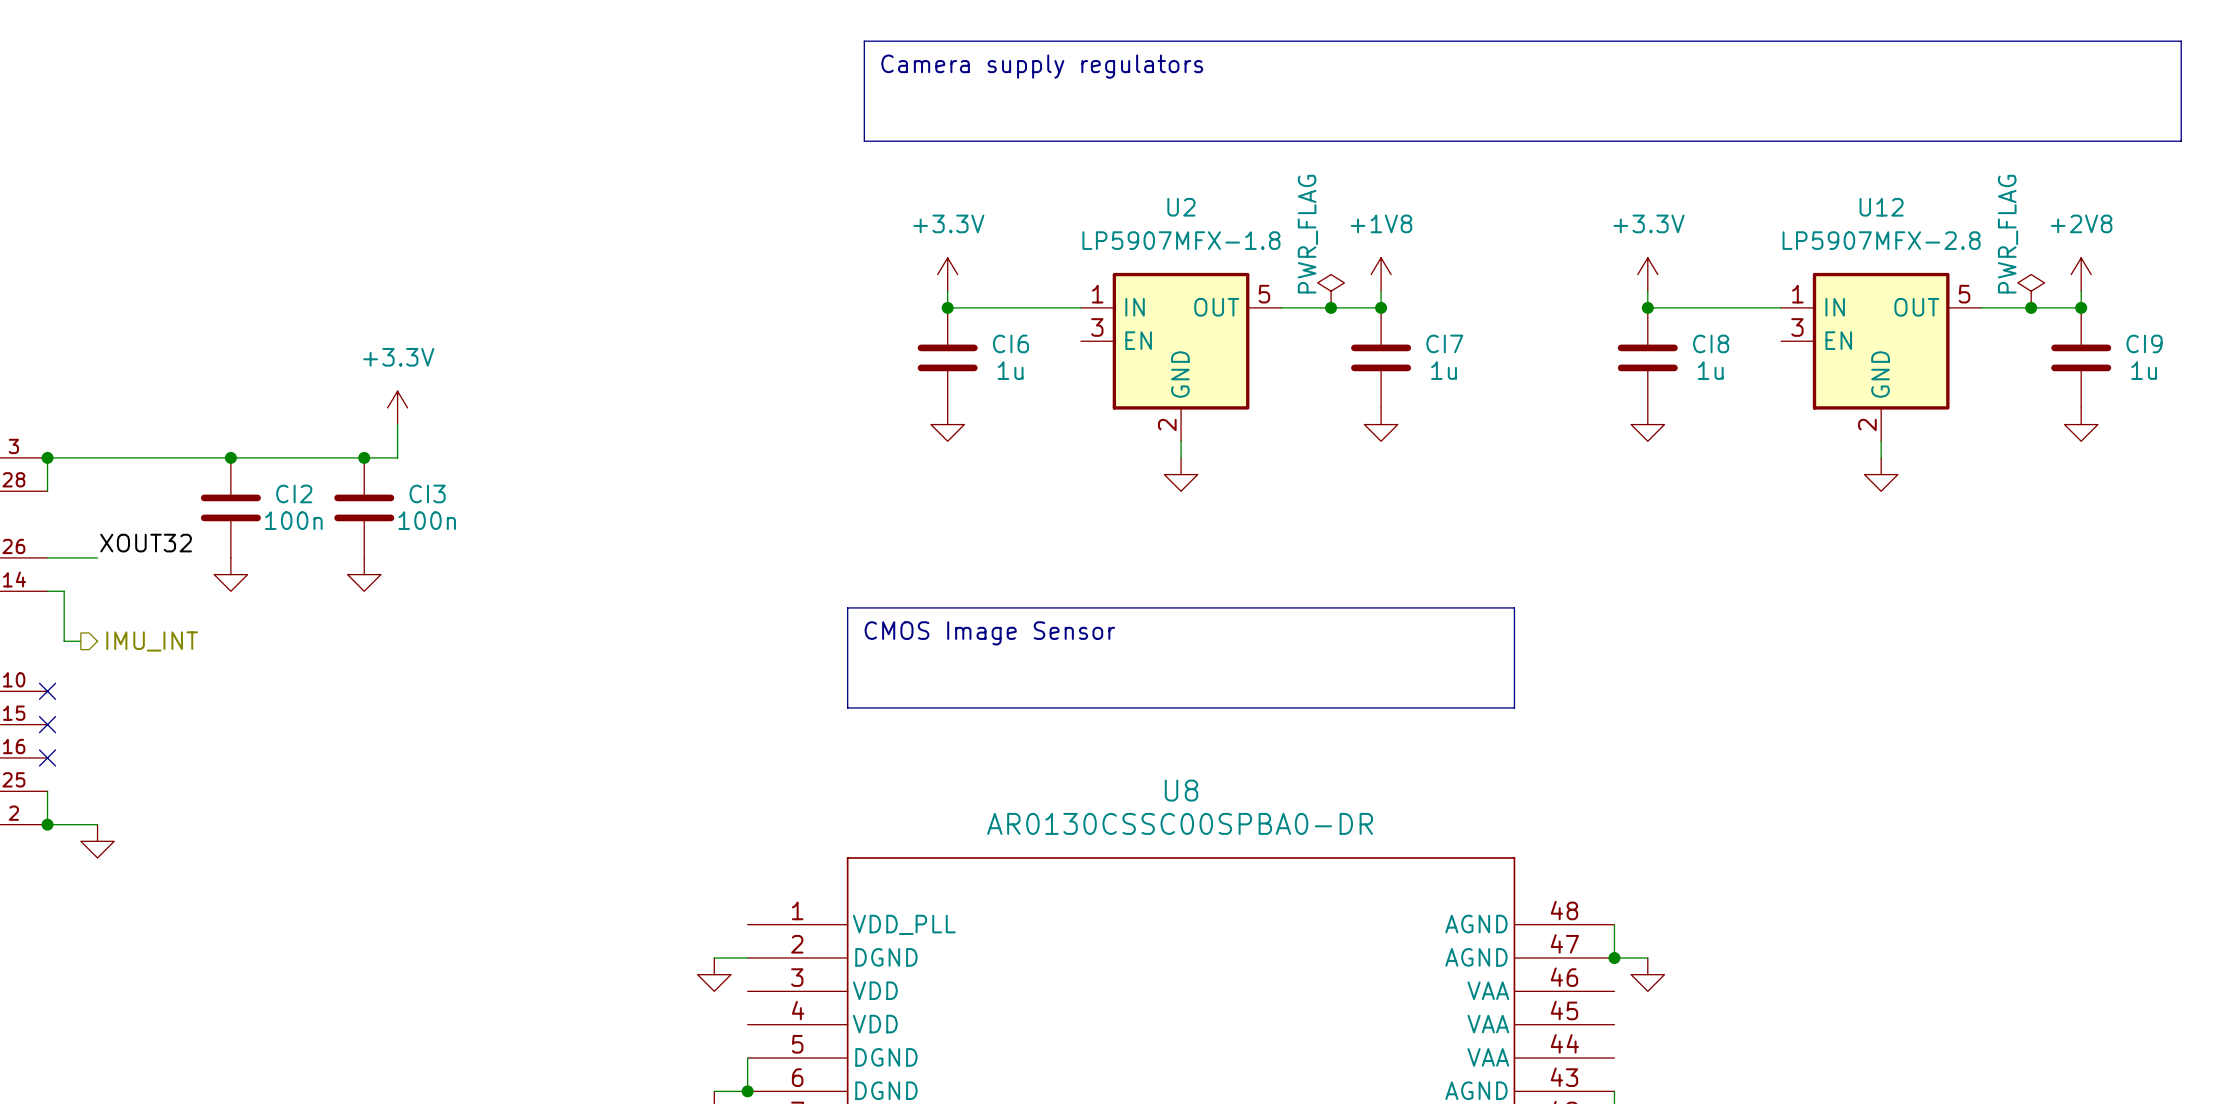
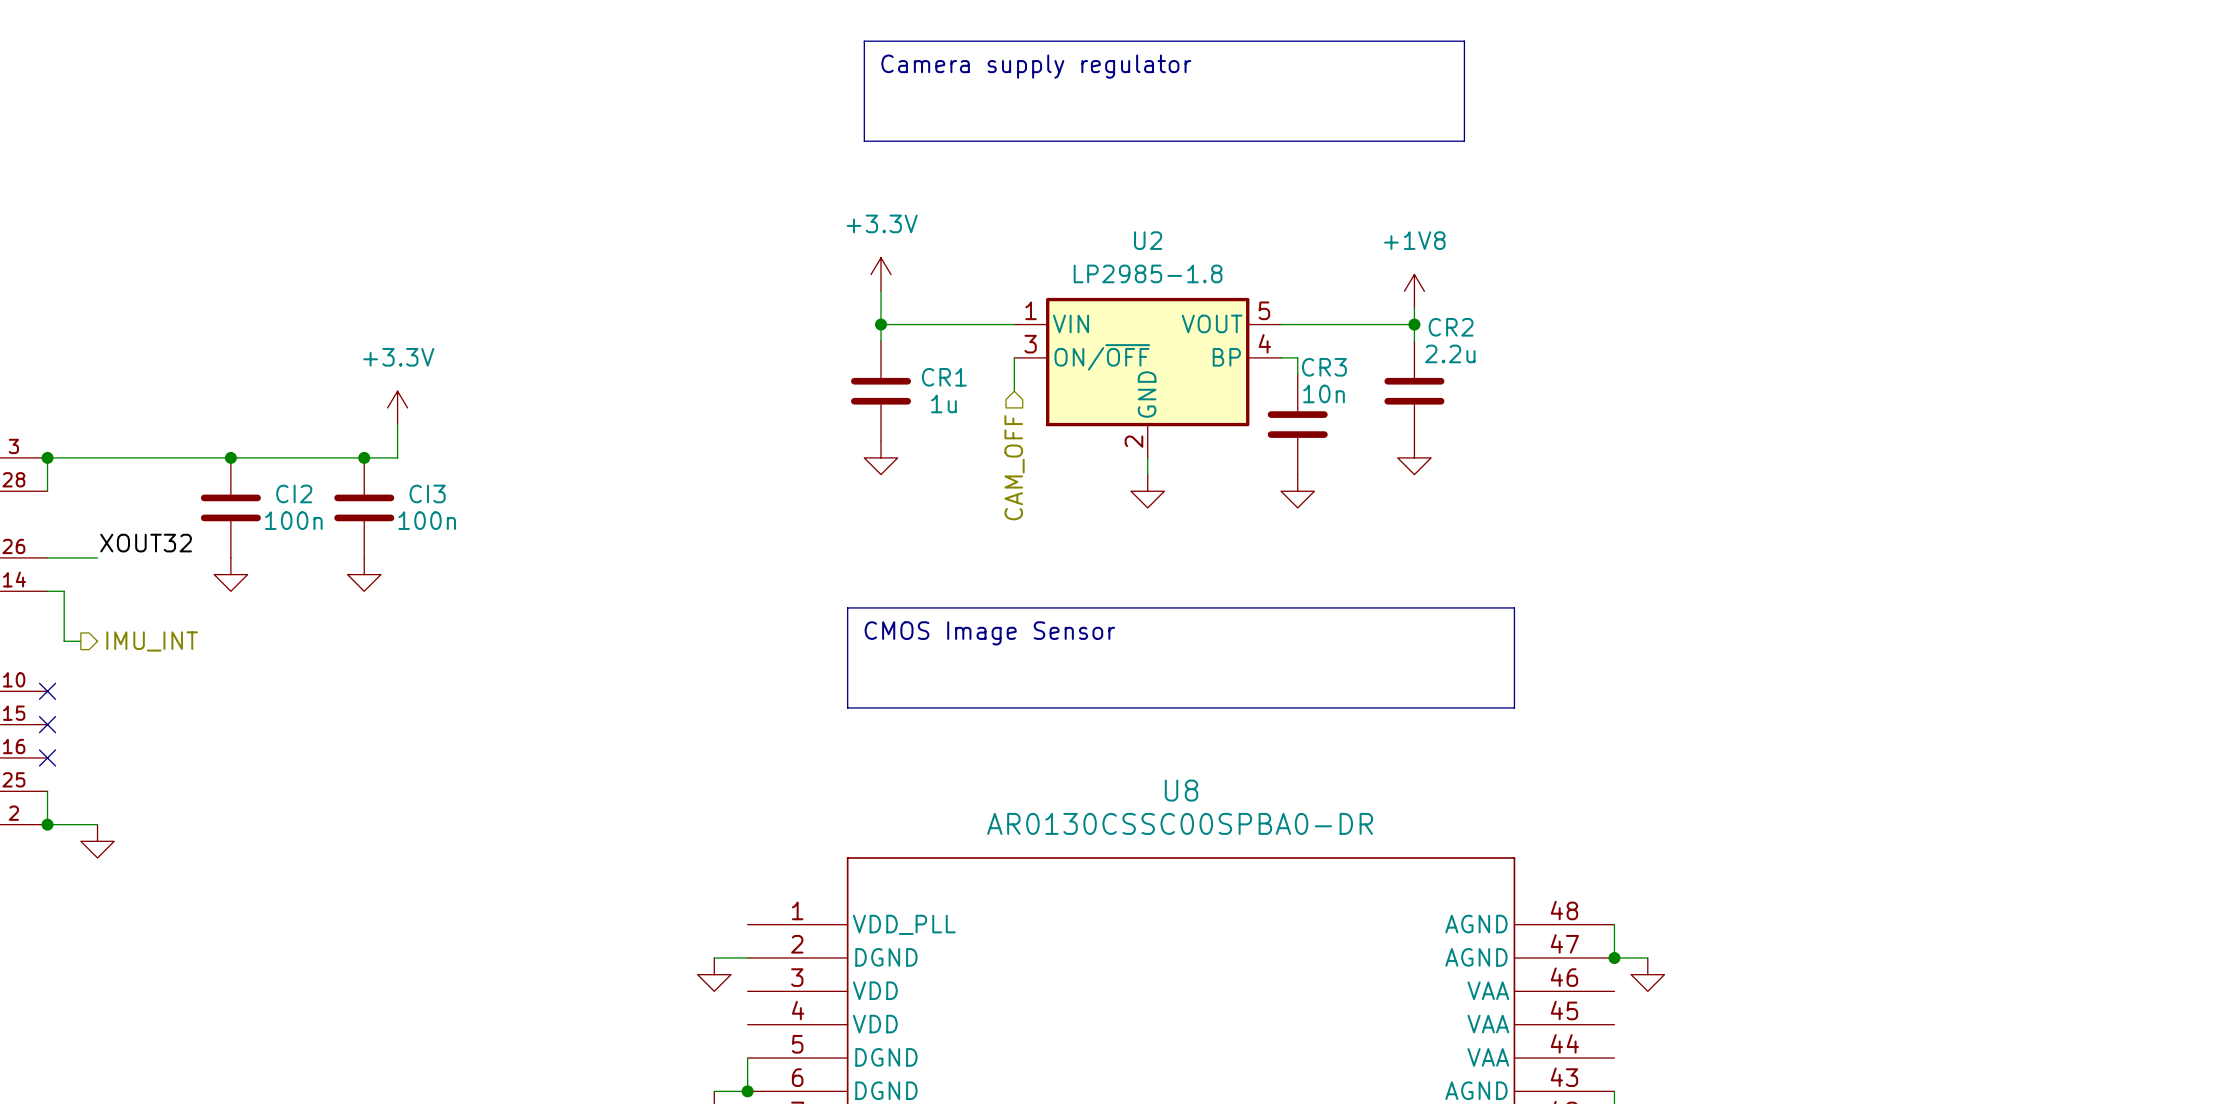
line: (1464, 41) (2181, 41) (2181, 141) (1464, 141) -> (1464, 41) (1464, 141)
text: Camera supply regulators (1042, 66) -> Camera supply regulator (1036, 66)
U2 value: LP5907MFX-1.8 (1181, 240) -> LP2985-1.8 (1148, 273)
U2 symbol: [1081, 272, 1282, 442] -> [1014, 297, 1282, 458]
power symbol position: +3.3V (947, 274) -> +3.3V (881, 274)
power symbol position: +1V8 (1381, 274) -> +1V8 (1414, 291)
power symbol: +3.3V (1647, 274) -> none
power symbol: +2V8 (2081, 274) -> none
wire: none -> (881, 291) (881, 341)
wire: (947, 291) (947, 307) (1081, 307) -> none
power symbol: PWR_FLAG (1331, 291) -> none
wire: (1381, 291) (1381, 307) (1281, 307) -> none
wire: (1647, 291) (1647, 307) (1781, 307) -> none
power symbol: PWR_FLAG (2031, 291) -> none
wire: (2081, 291) (2081, 307) (1981, 307) -> none
junction position: (947, 307) -> (881, 324)
junction: (1331, 307) -> none
junction position: (1381, 307) -> (1414, 324)
wire: none -> (1414, 307) (1414, 341)
junction: (1647, 307) -> none
junction: (2031, 307) -> none
junction: (2081, 307) -> none
wire: none -> (881, 324) (1014, 324)
wire: none -> (1281, 324) (1414, 324)
CI6: 1u (947, 357) -> none
wire: none -> (1014, 357) (1014, 391)
wire: none -> (1281, 357) (1297, 357) (1297, 374)
CI7: 1u (1381, 357) -> none
CI8: 1u (1647, 357) -> none
U12: LP5907MFX-2.8 (1881, 357) -> none
CI9: 1u (2081, 357) -> none
CR1: none -> 1u (881, 391)
CR2: none -> 2.2u (1414, 391)
power symbol position: (947, 424) -> (881, 457)
CR3: none -> 10n (1297, 424)
power symbol position: (1381, 424) -> (1414, 457)
power symbol: (1647, 424) -> none
power symbol: (2081, 424) -> none
wire: (1181, 441) (1181, 457) -> (1147, 457) (1147, 474)
wire: (1881, 441) (1881, 457) -> none
hierarchical label: none -> CAM_OFF (1014, 467)
power symbol position: (1181, 474) -> (1147, 491)
power symbol: (1881, 474) -> none
power symbol: none -> (1297, 491)

